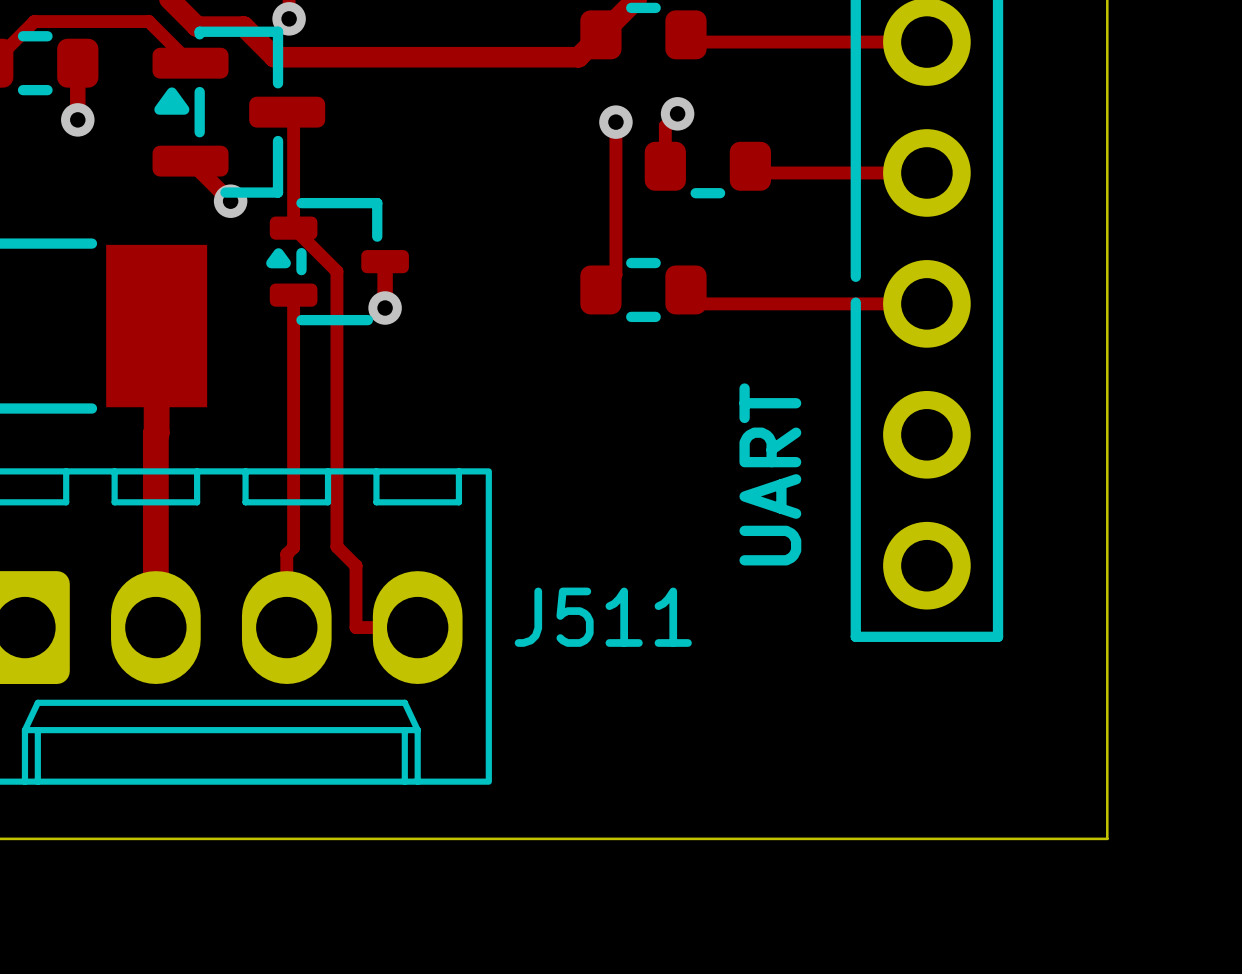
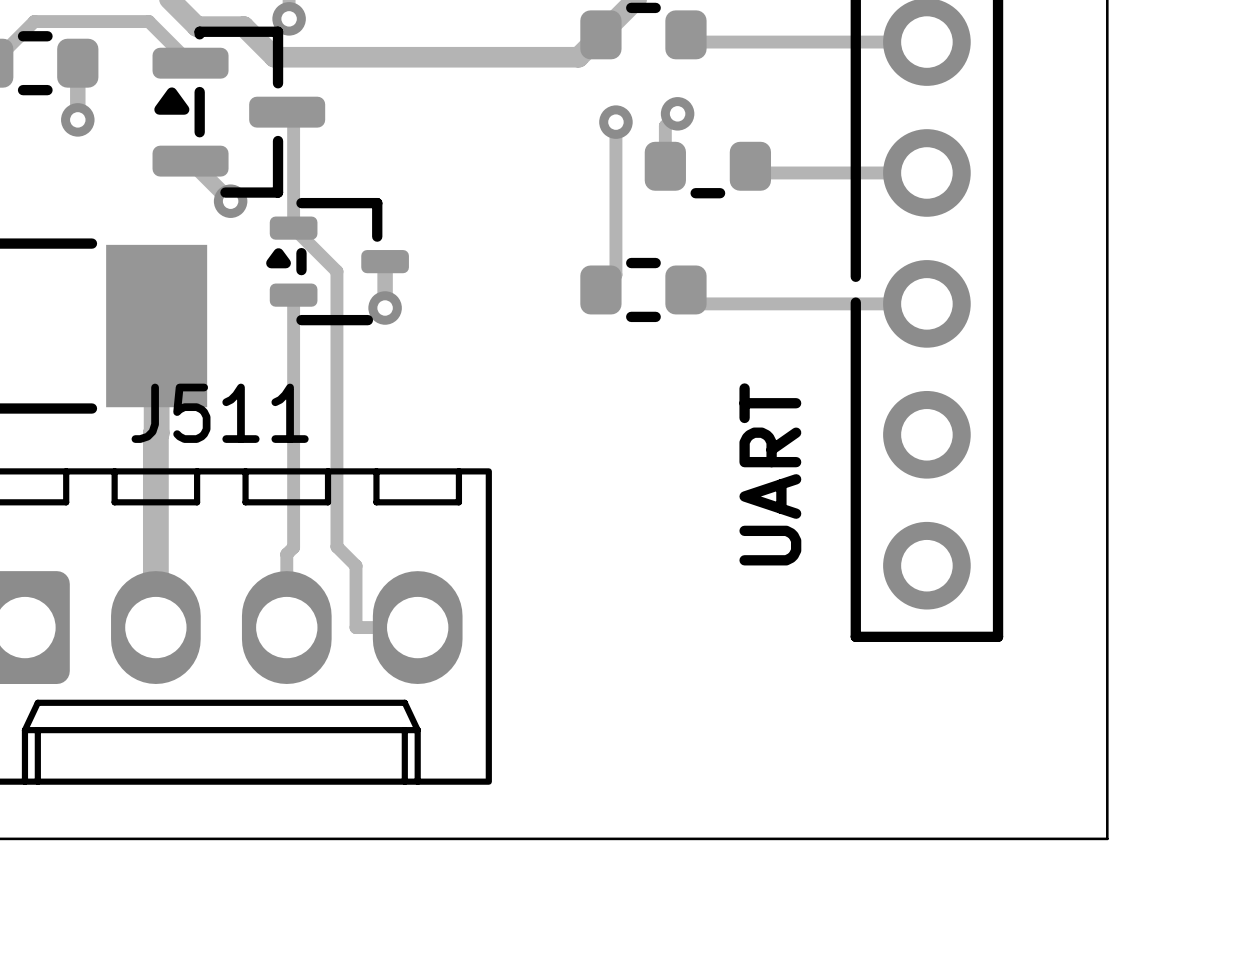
J511 name position: J511 (603, 617) -> J511 (220, 413)

